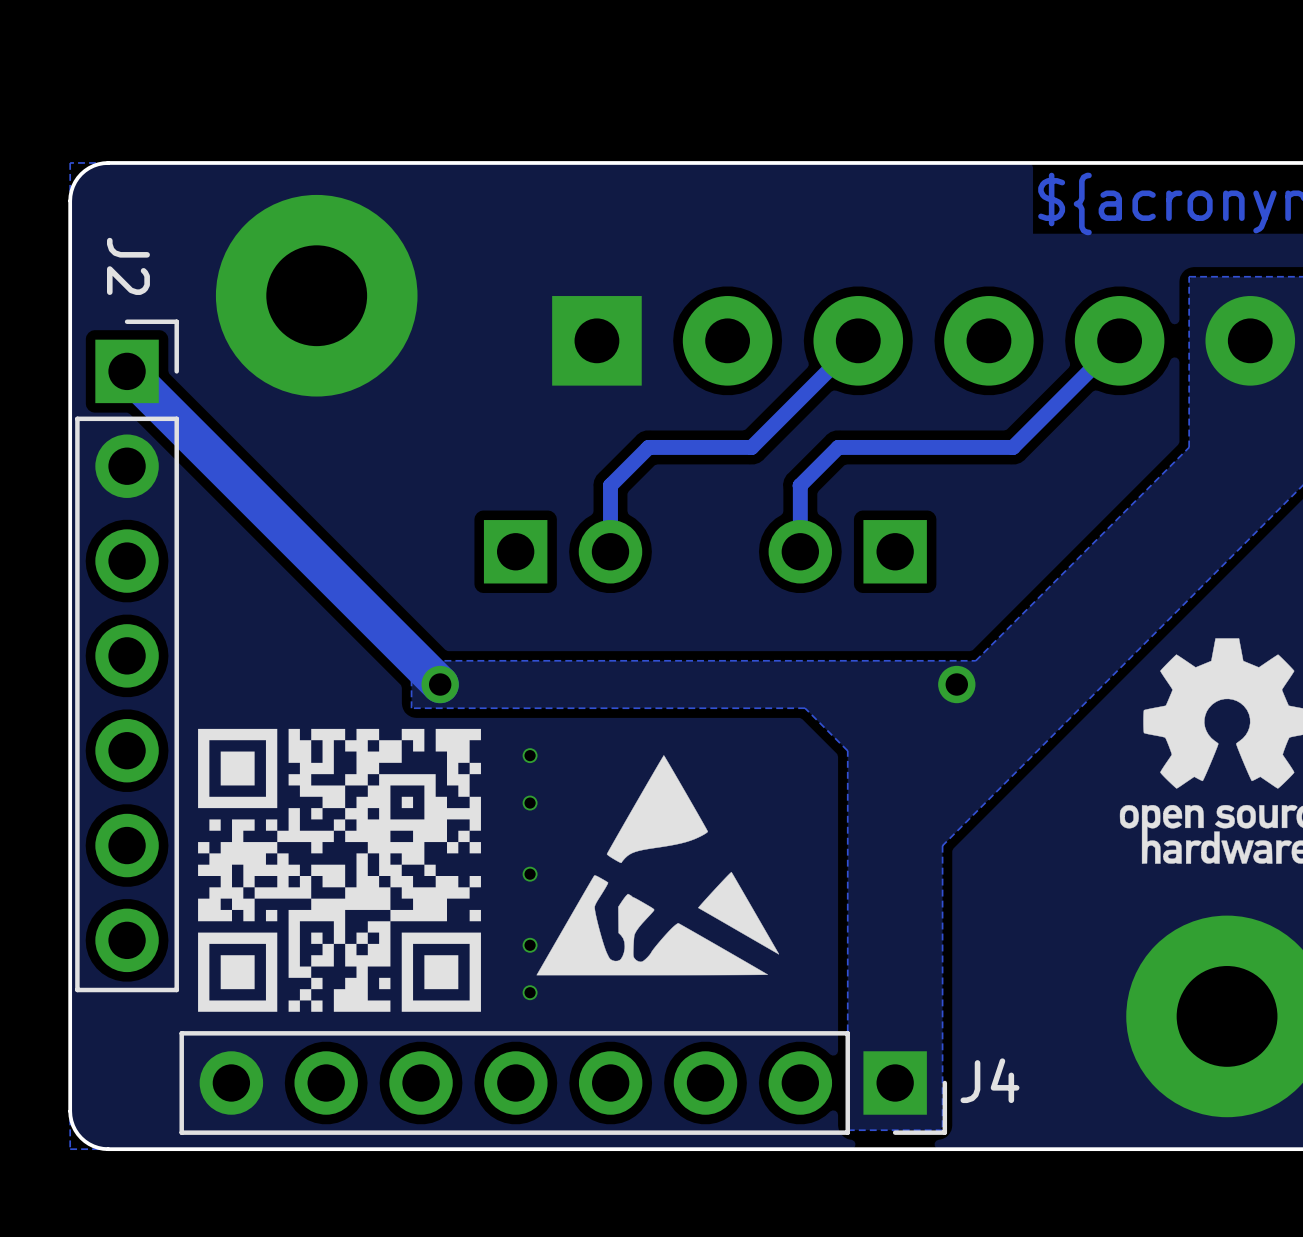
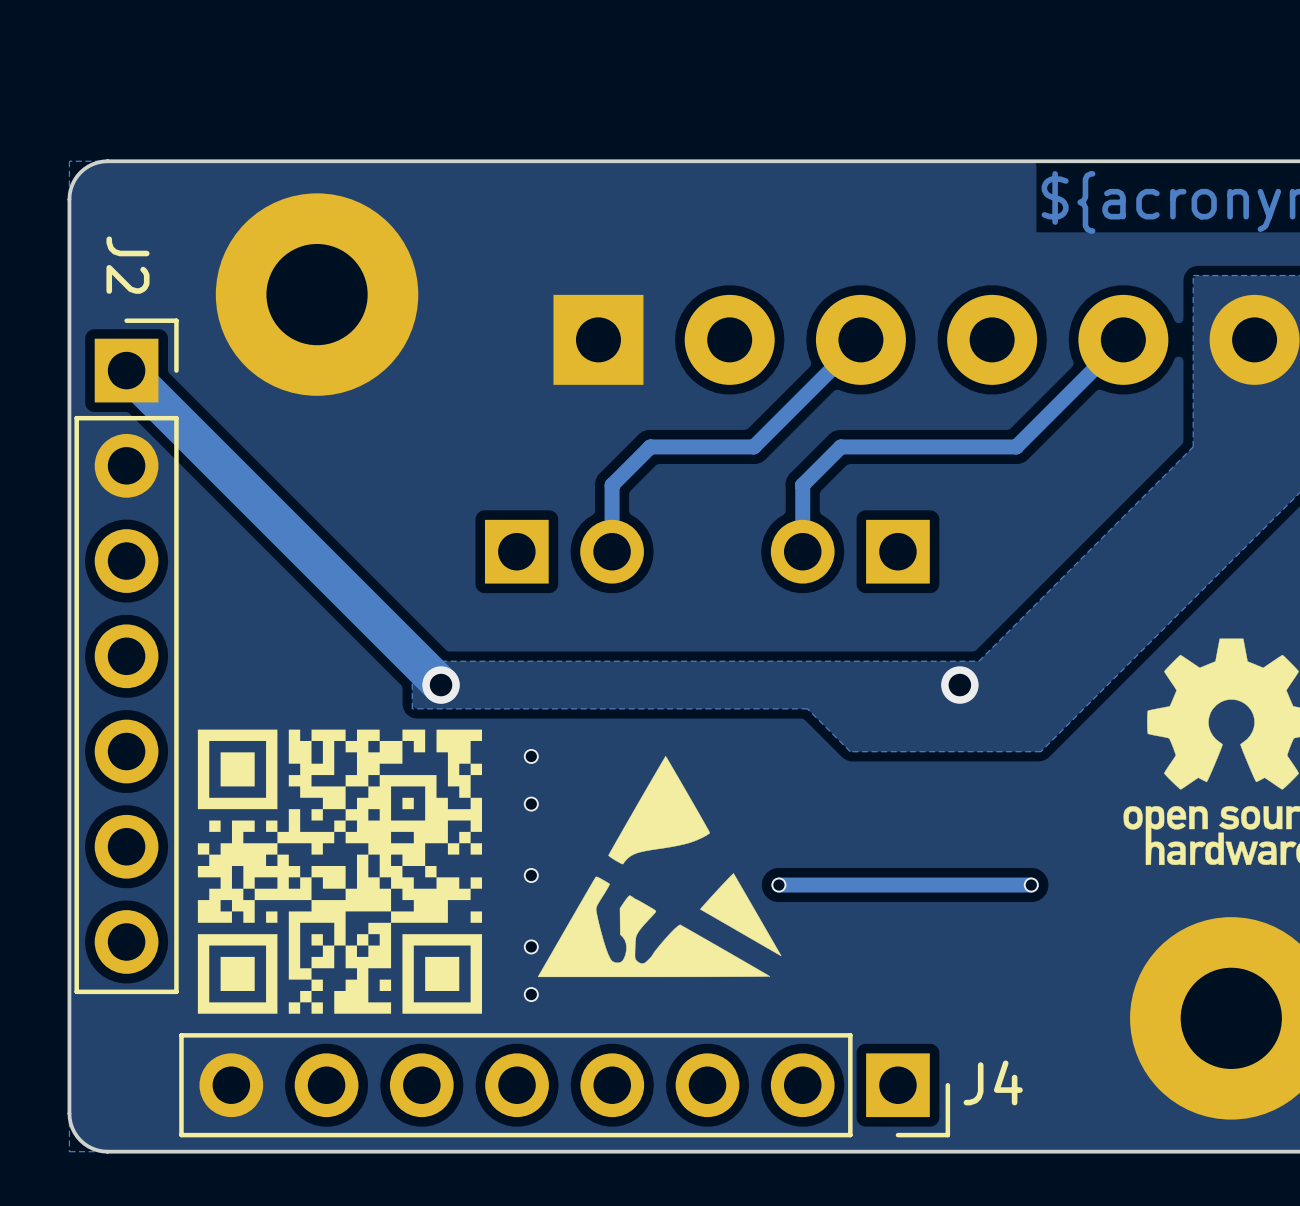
zone outline: (1037, 750) (942, 845) (942, 1130) (847, 1130) (847, 750) -> (1040, 751) (850, 751)
via: none -> (778, 885)
track: none -> (1031, 885) (778, 885)
via: none -> (1031, 885)

